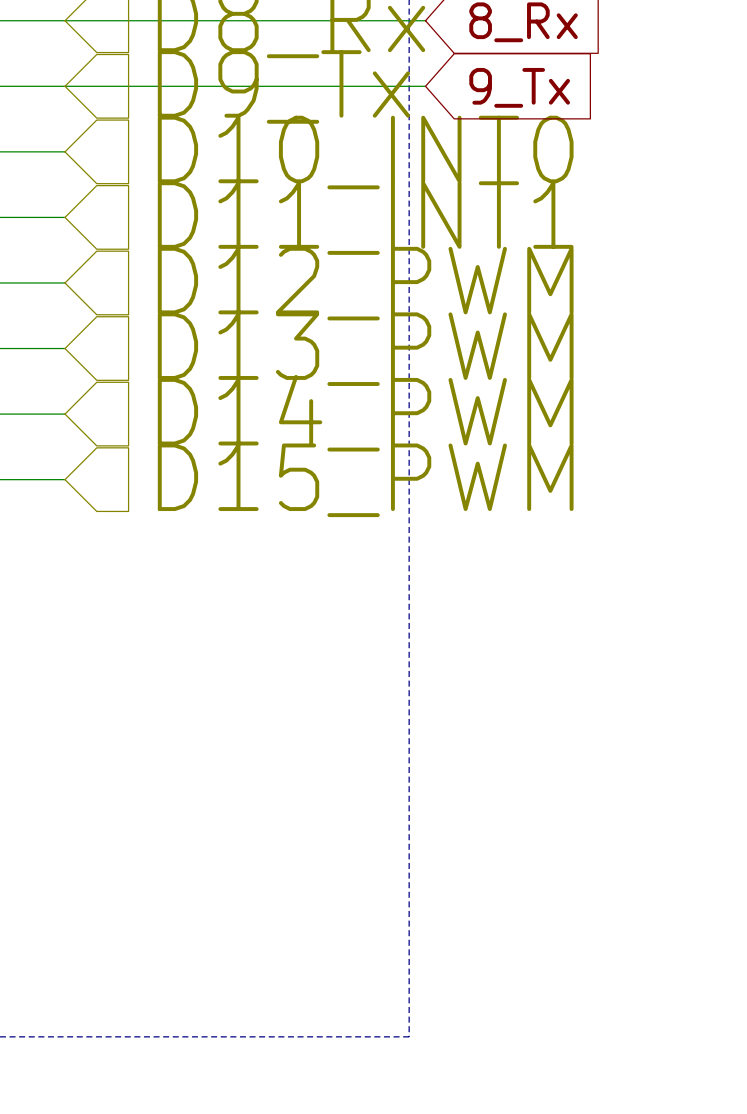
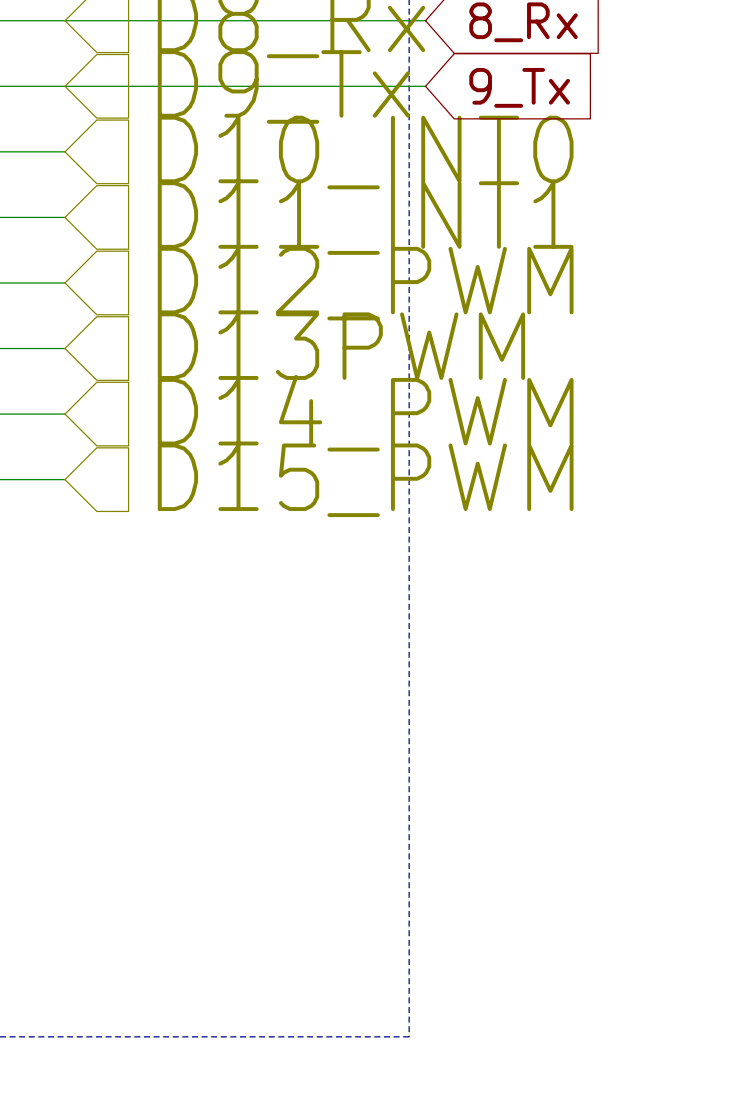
hierarchical label: D13_PWM (365, 349) -> D13PWM (341, 346)

